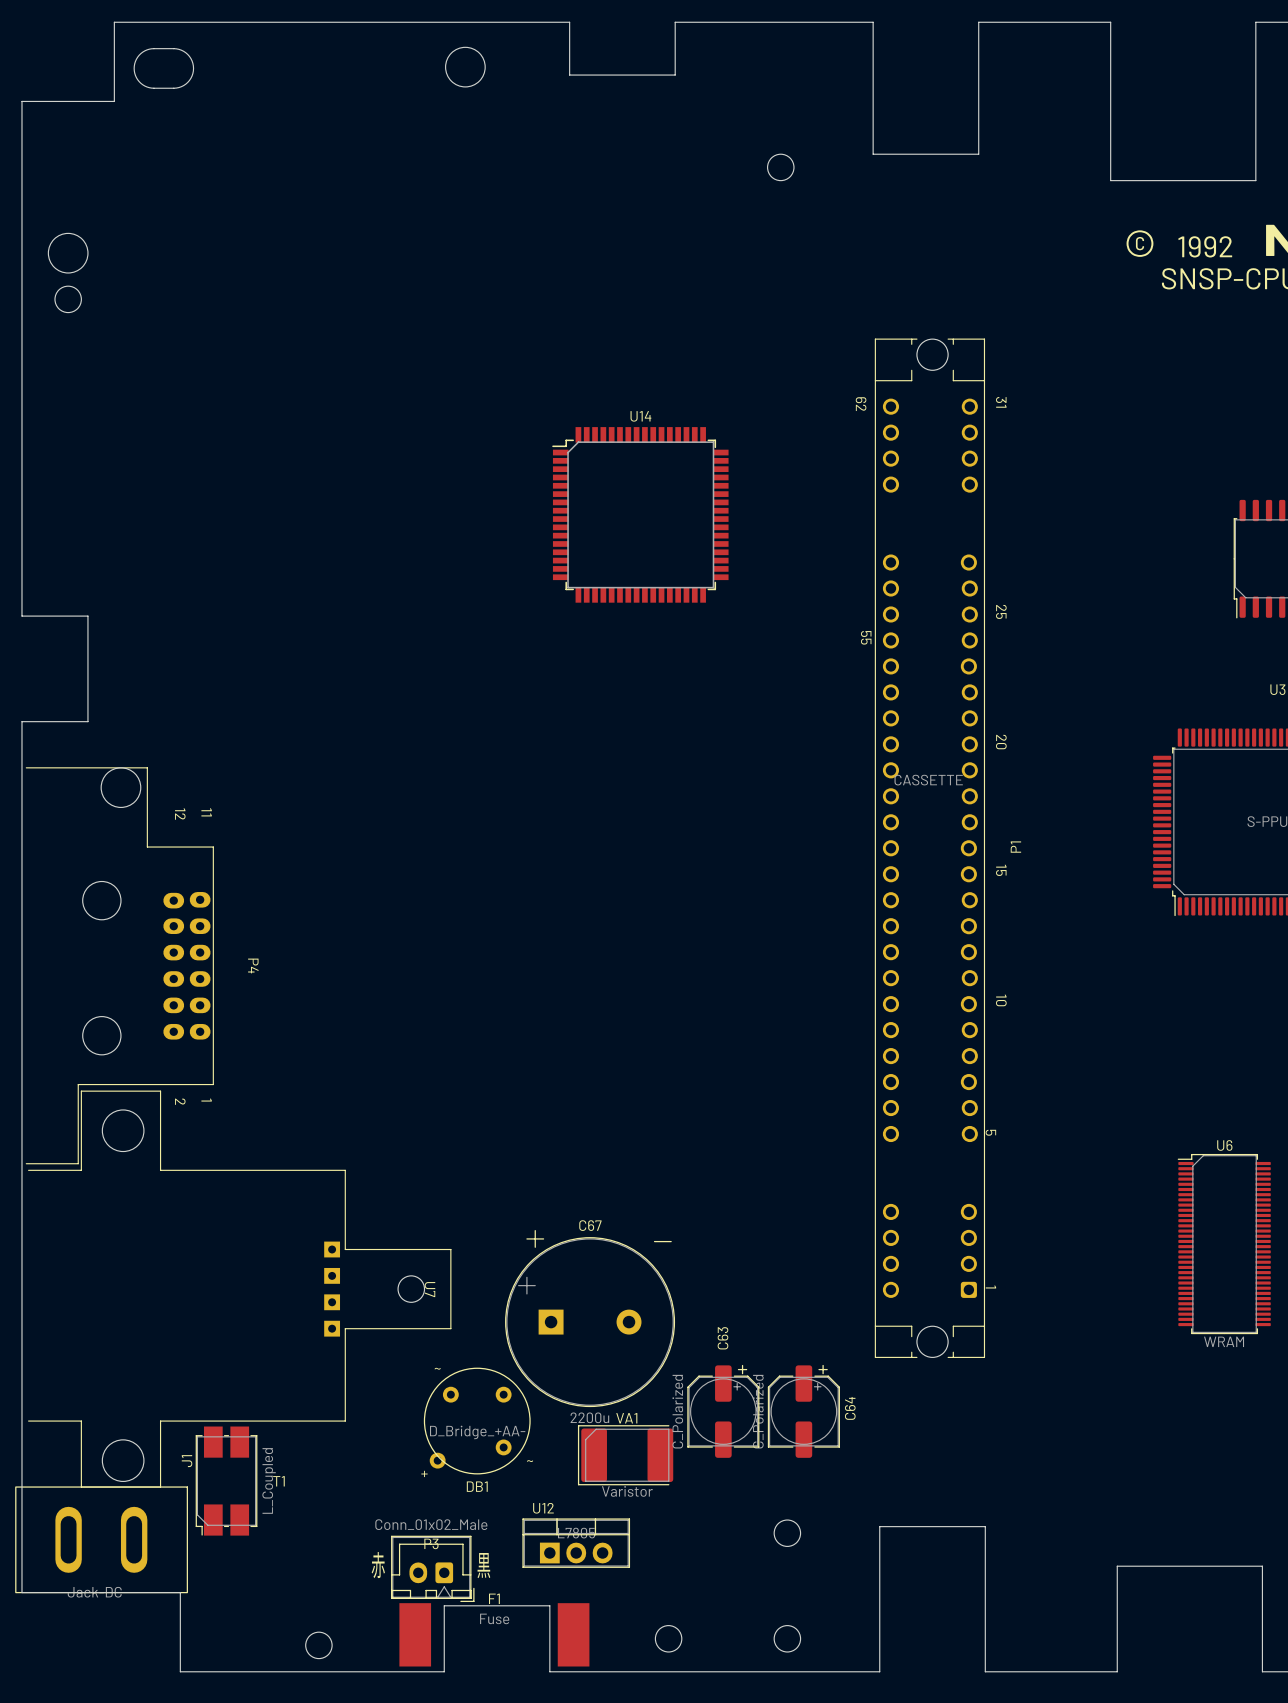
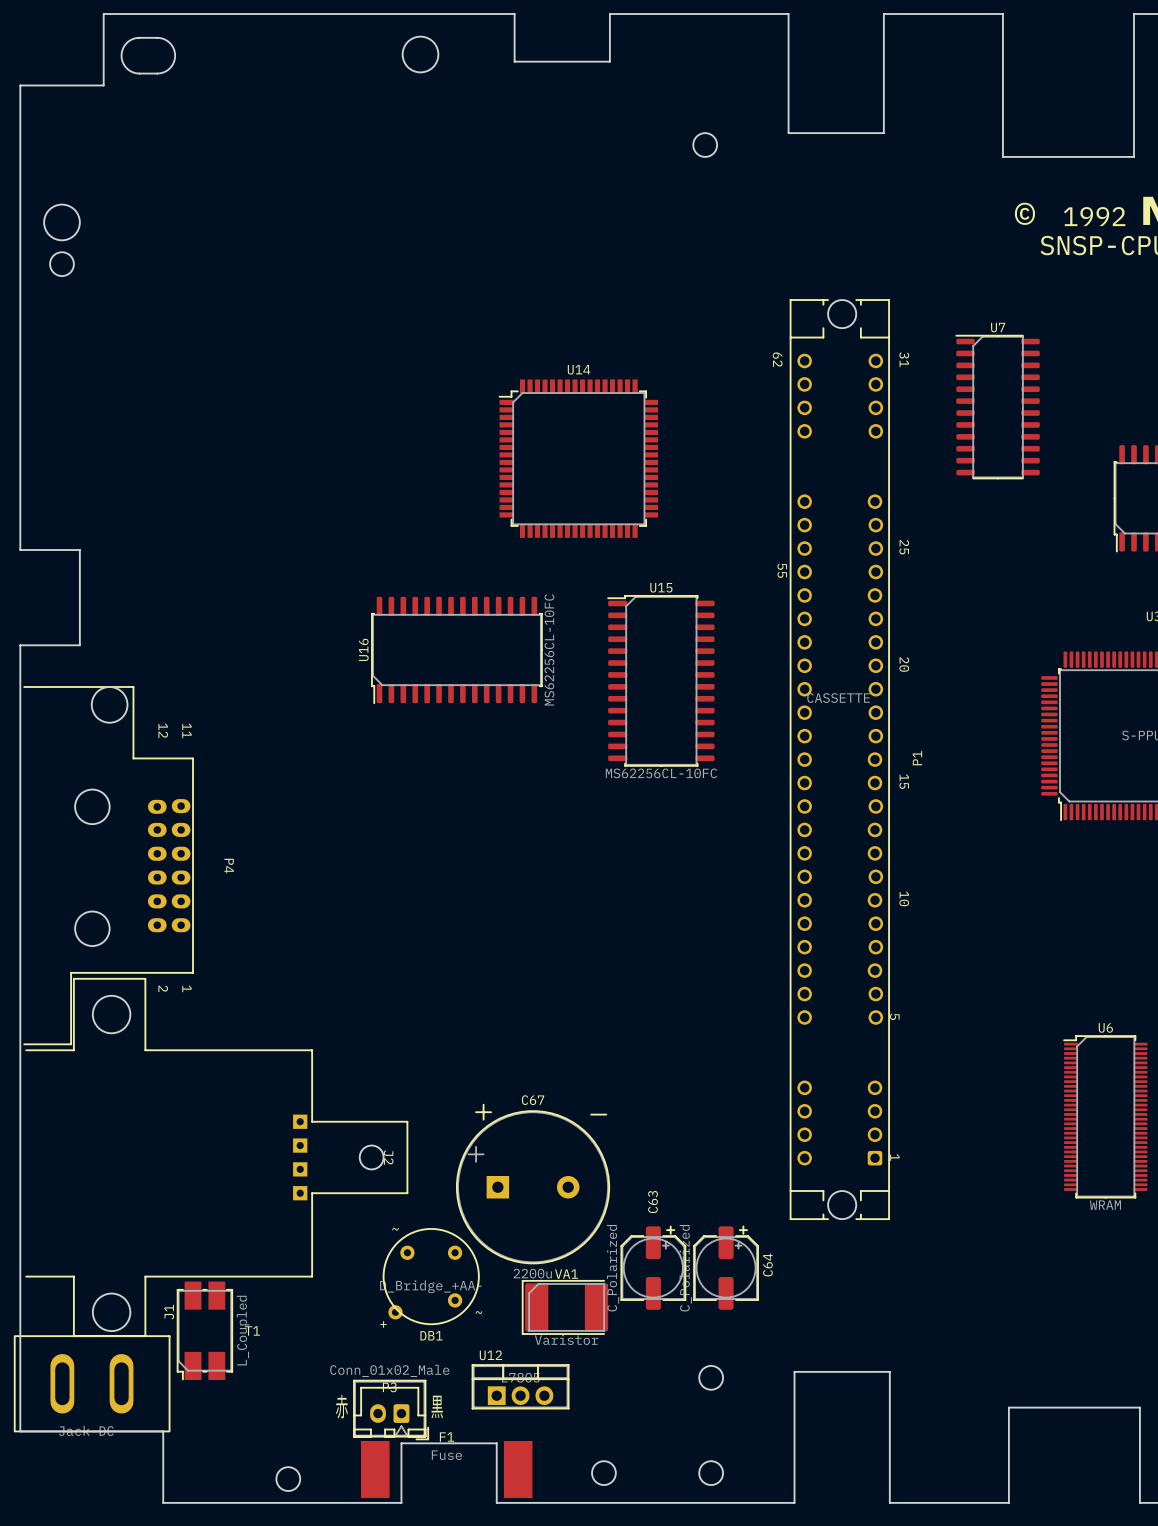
U7: none -> (997, 407)
U16: none -> MS62256CL-10FC (456, 650)
U15: none -> MS62256CL-10FC (661, 680)
U7 name: U7 (430, 1289) -> J2 (388, 1157)

